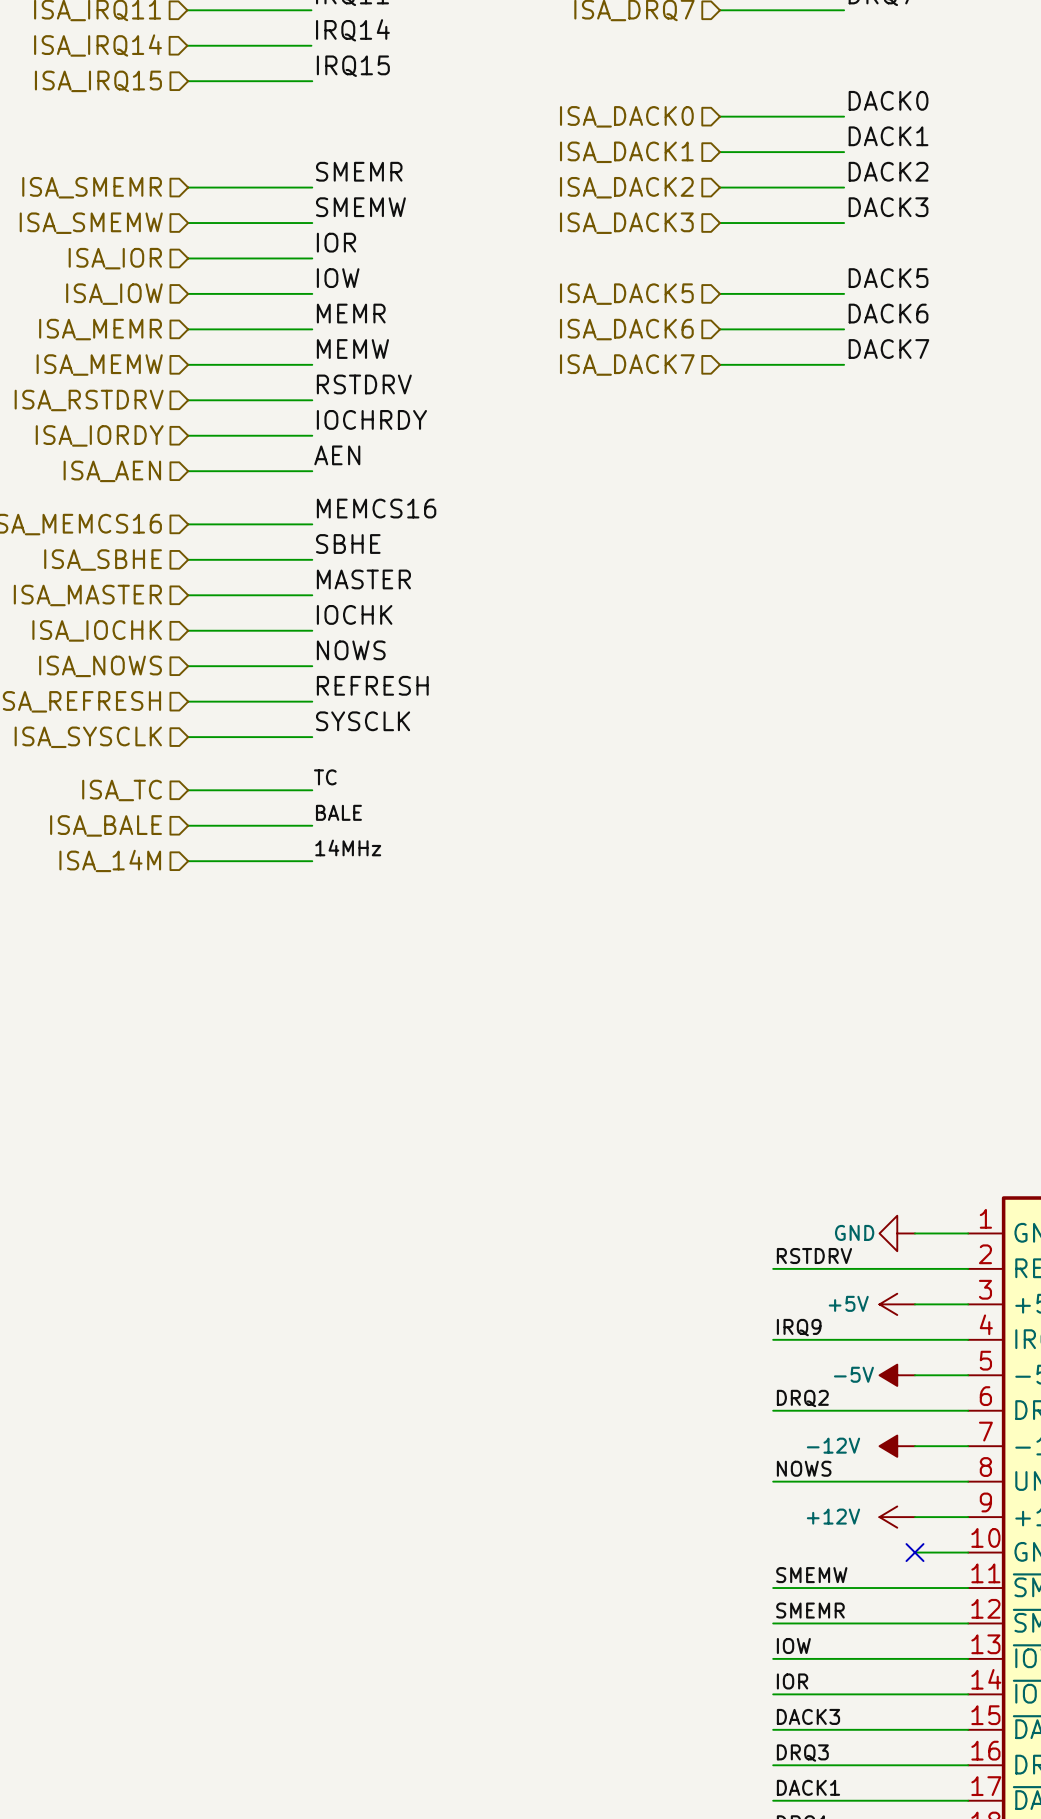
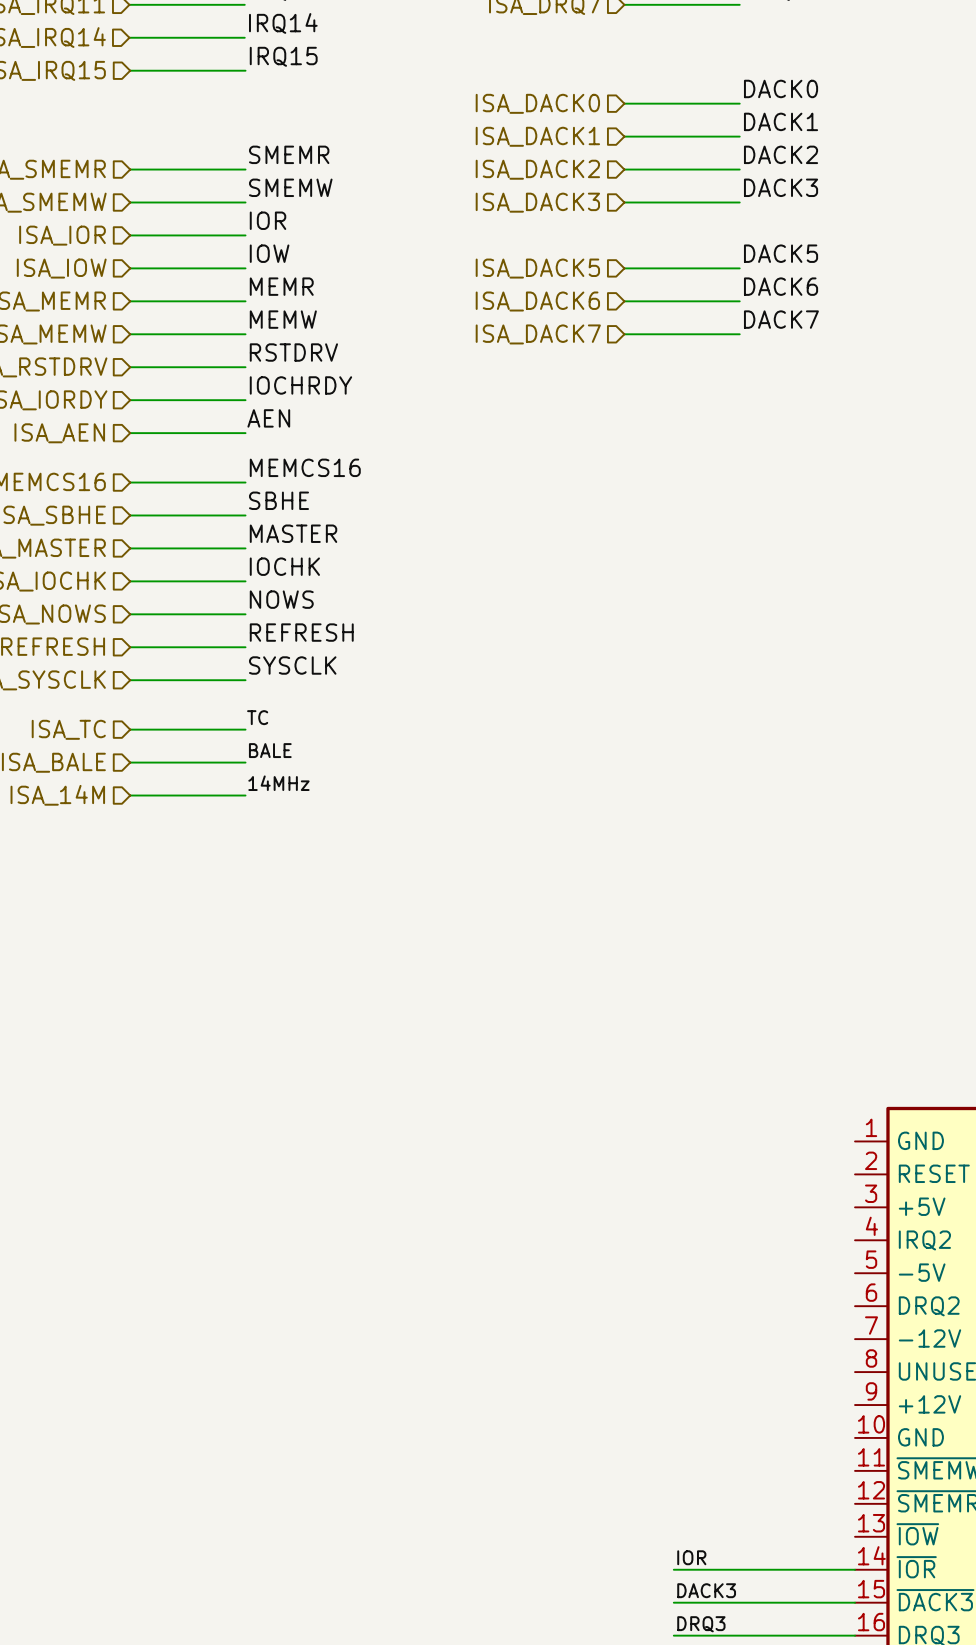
power symbol: GND (897, 1233) -> none
wire: (914, 1233) (968, 1233) -> none
label: RSTDRV (814, 1256) -> none
wire: (773, 1268) (968, 1268) -> none
power symbol: +5V (897, 1304) -> none
wire: (914, 1304) (968, 1304) -> none
label: IRQ9 (799, 1327) -> none
wire: (773, 1339) (968, 1339) -> none
power symbol: -5V (897, 1375) -> none
wire: (914, 1375) (968, 1375) -> none
label: DRQ2 (802, 1398) -> none
wire: (773, 1410) (968, 1410) -> none
power symbol: -12V (897, 1446) -> none
wire: (914, 1446) (968, 1446) -> none
label: NOWS (804, 1468) -> none
wire: (773, 1481) (968, 1481) -> none
power symbol: +12V (897, 1517) -> none
wire: (914, 1517) (968, 1517) -> none
wire: (914, 1552) (968, 1552) -> none
no-connect mark: (914, 1552) -> none
label: SMEMW (811, 1575) -> none
wire: (773, 1588) (968, 1588) -> none
label: SMEMR (810, 1610) -> none
wire: (773, 1623) (968, 1623) -> none
label: IOW (793, 1646) -> none
wire: (773, 1658) (968, 1658) -> none

